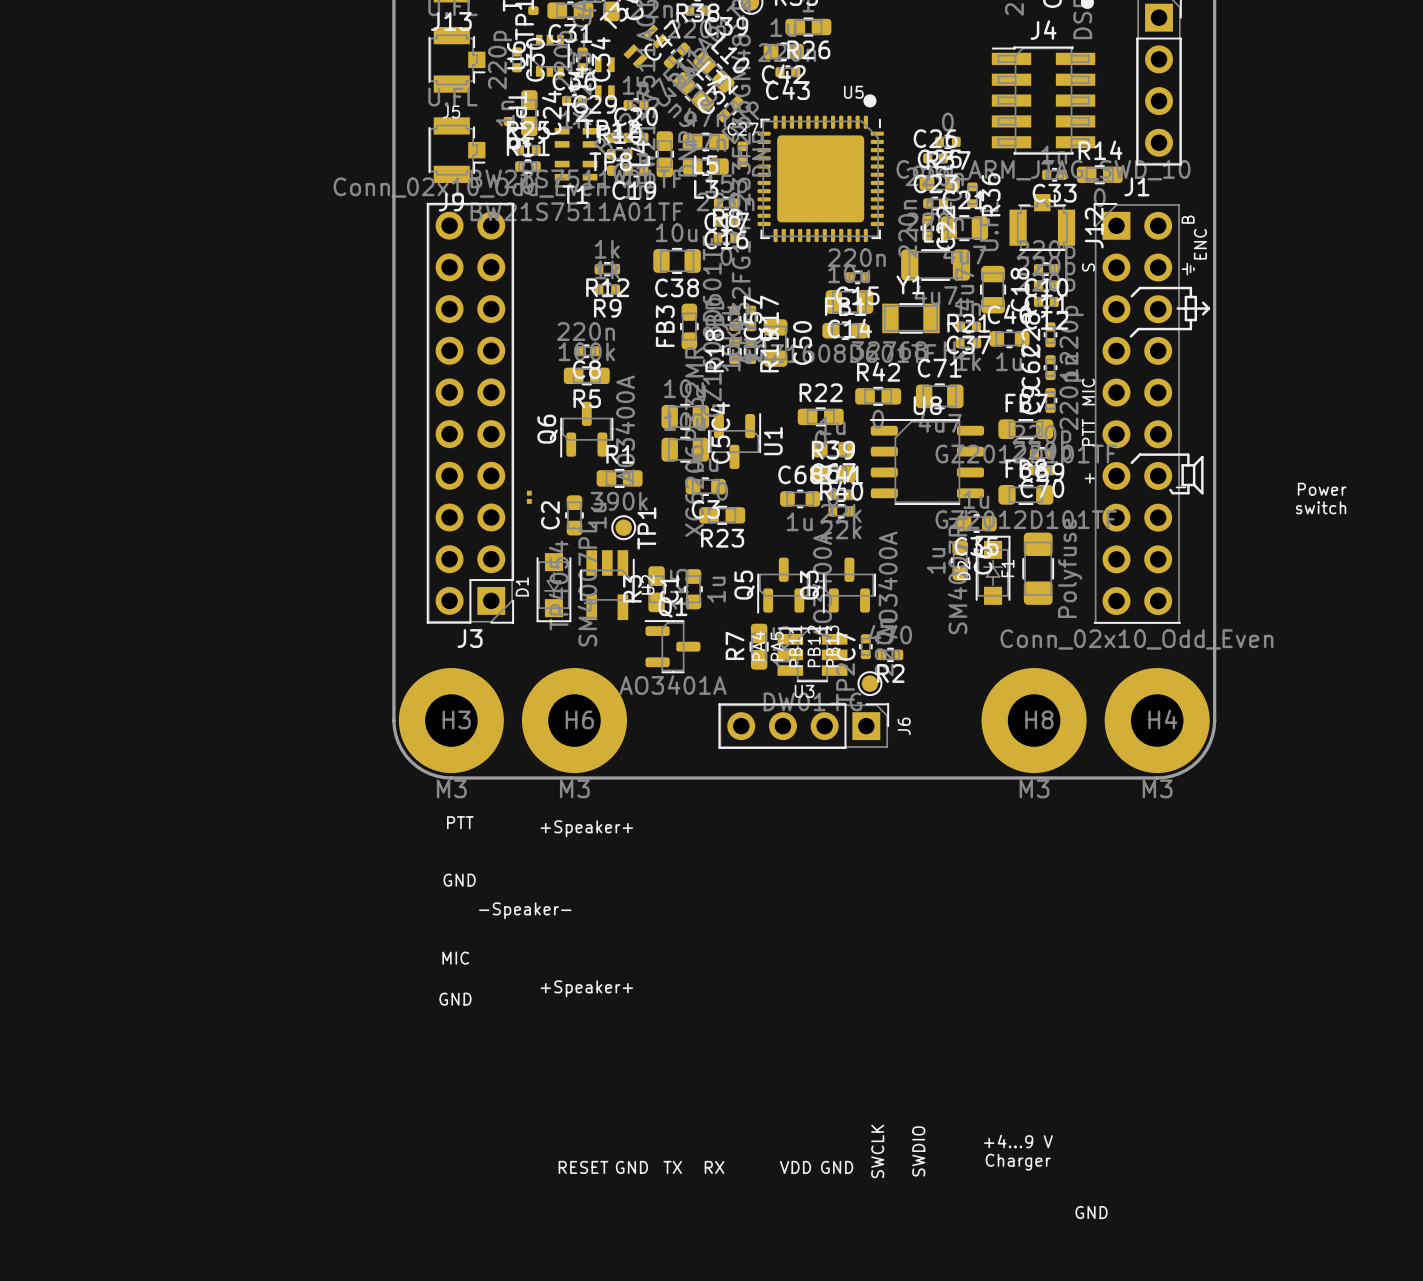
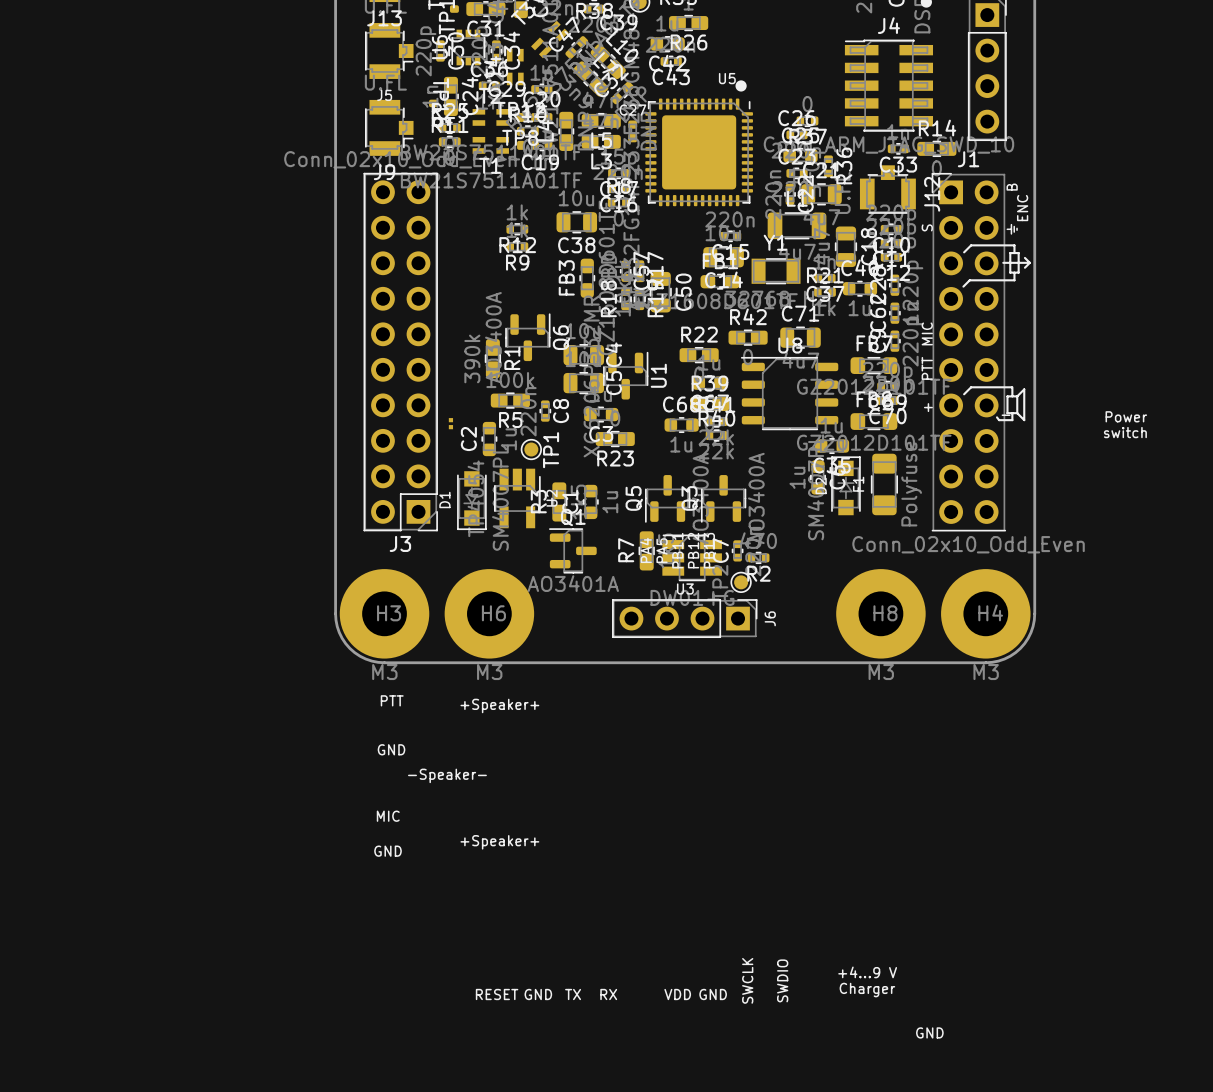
C8 rotation: 0° (586, 351) -> 90° clockwise (545, 411)
C8 position: (586, 351) -> (545, 411)
R5 position: (586, 375) -> (510, 400)
Q6 rotation: 0° (586, 429) -> 180° (527, 337)
Q6 position: (586, 429) -> (527, 337)
R1 rotation: 0° (619, 478) -> 90° clockwise (492, 358)
R1 position: (619, 478) -> (492, 358)

